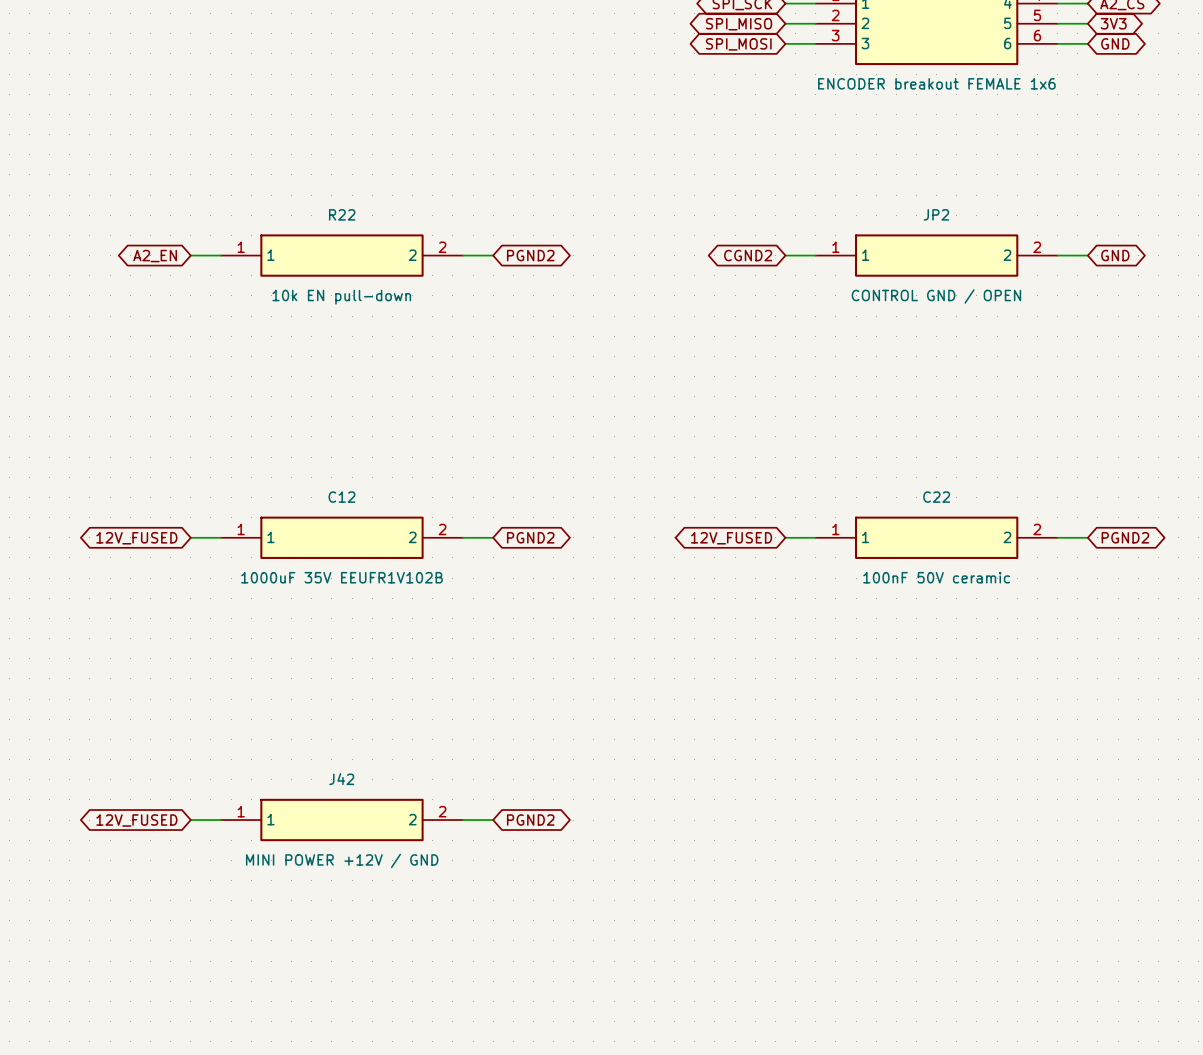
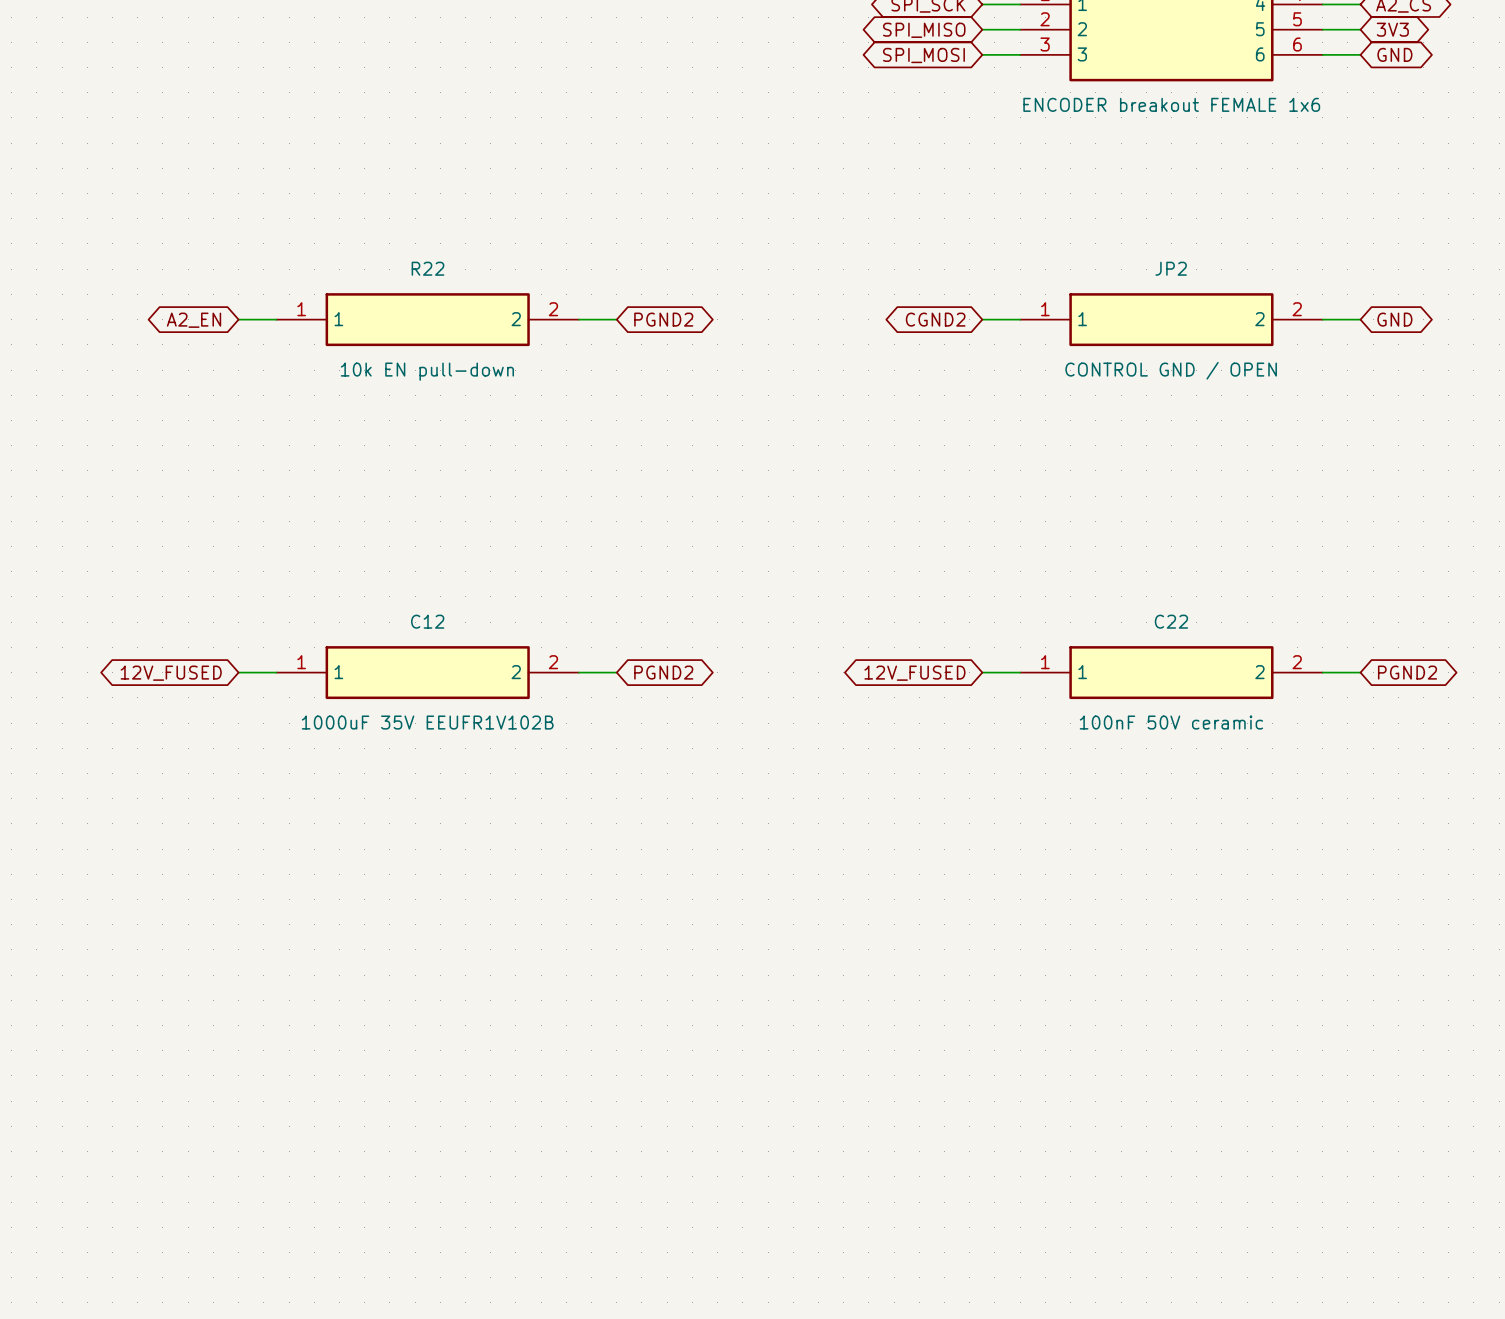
global label: 12V_FUSED (136, 820) -> none
wire: (190, 820) (221, 820) -> none
J42: MINI POWER +12V / GND (341, 820) -> none
wire: (462, 820) (493, 820) -> none
global label: PGND2 (530, 820) -> none

